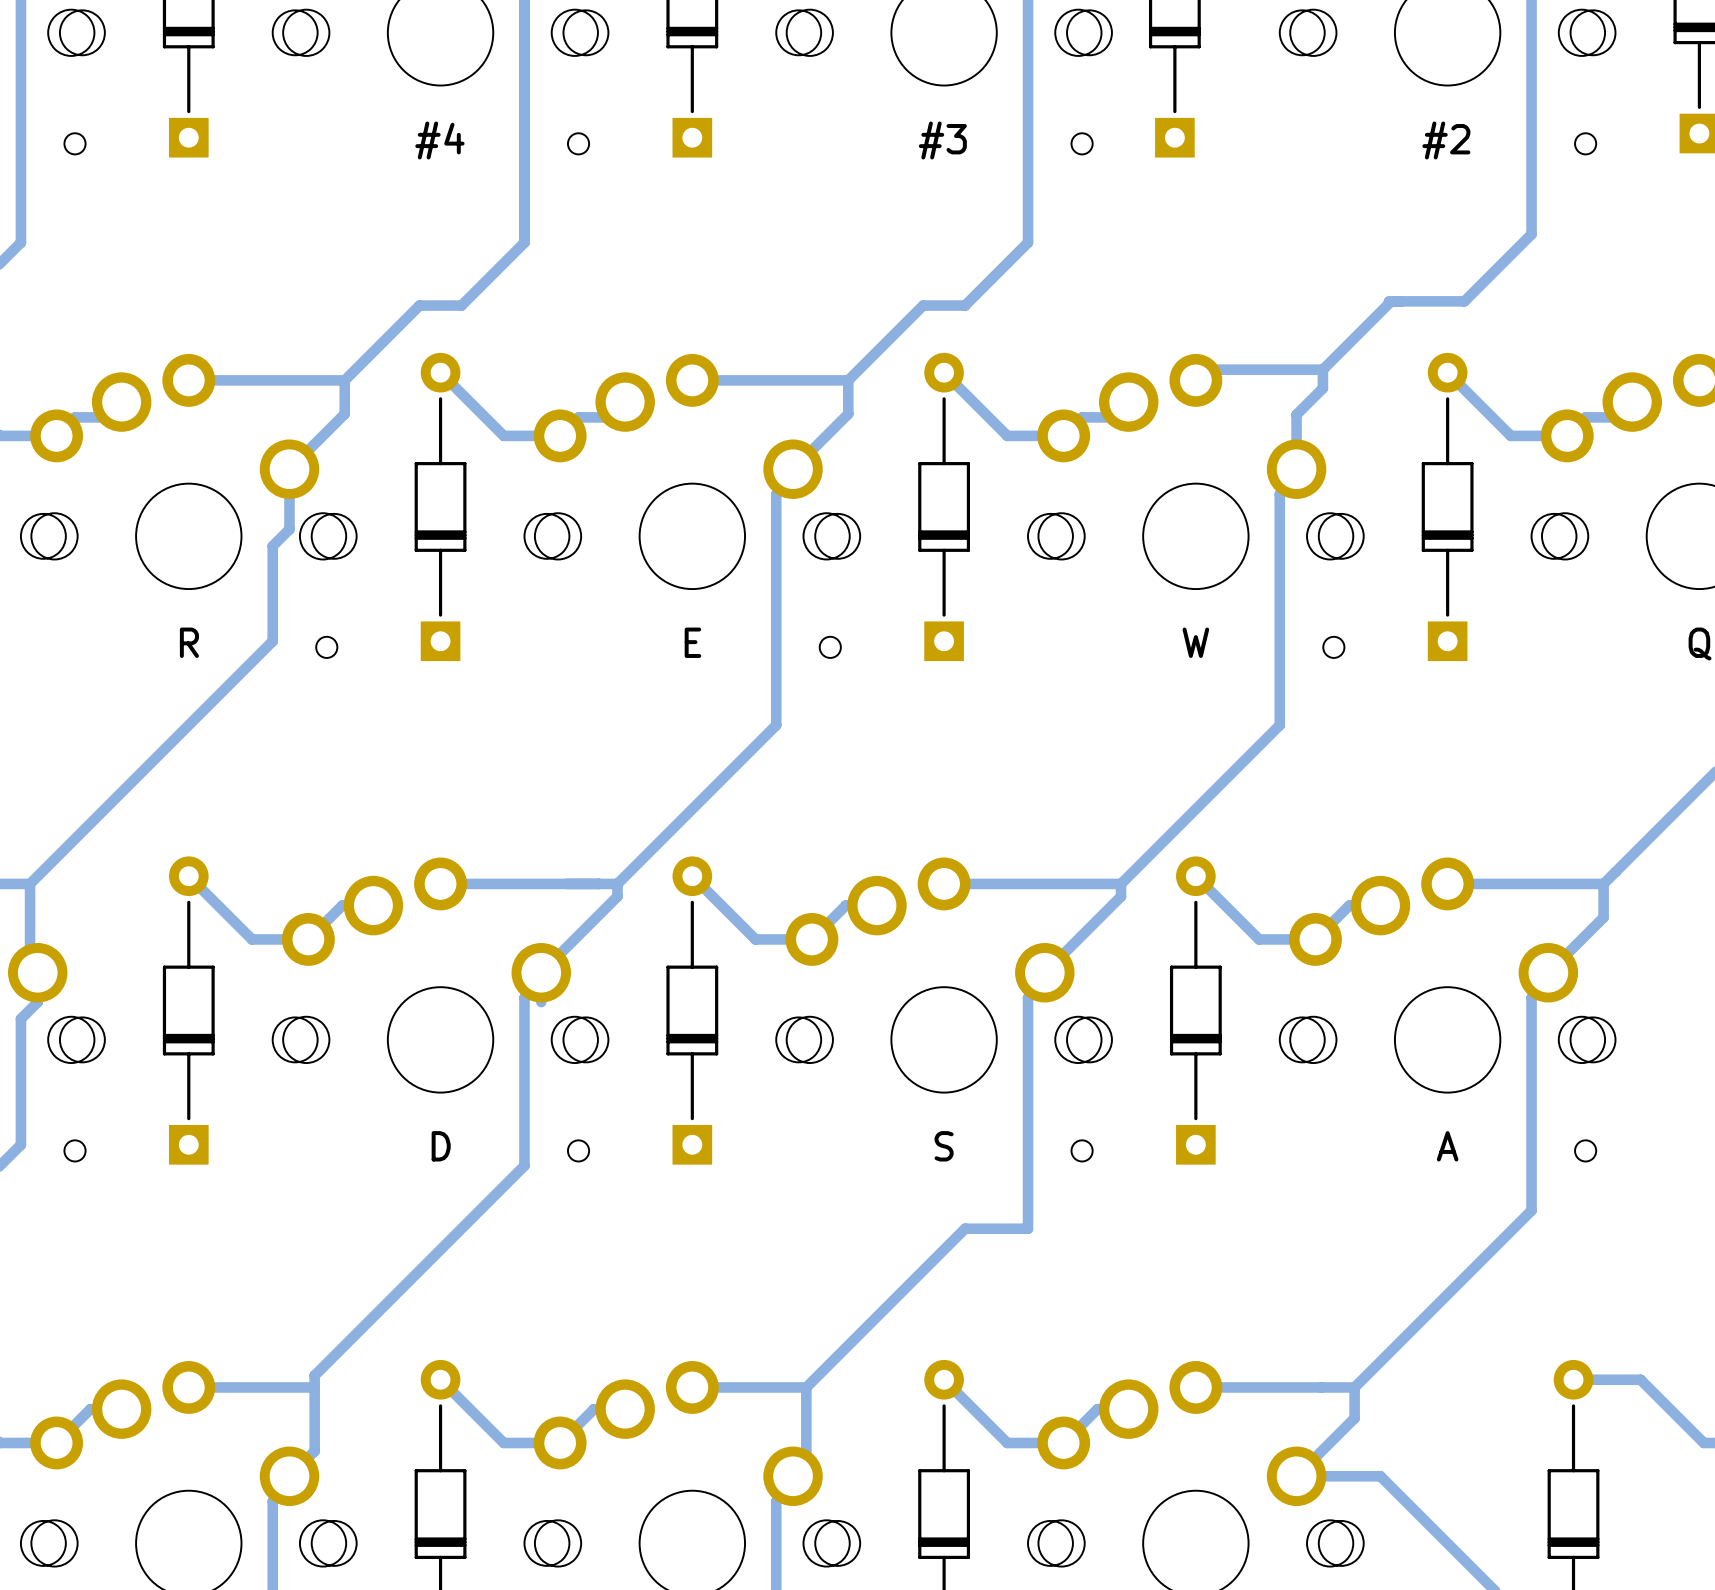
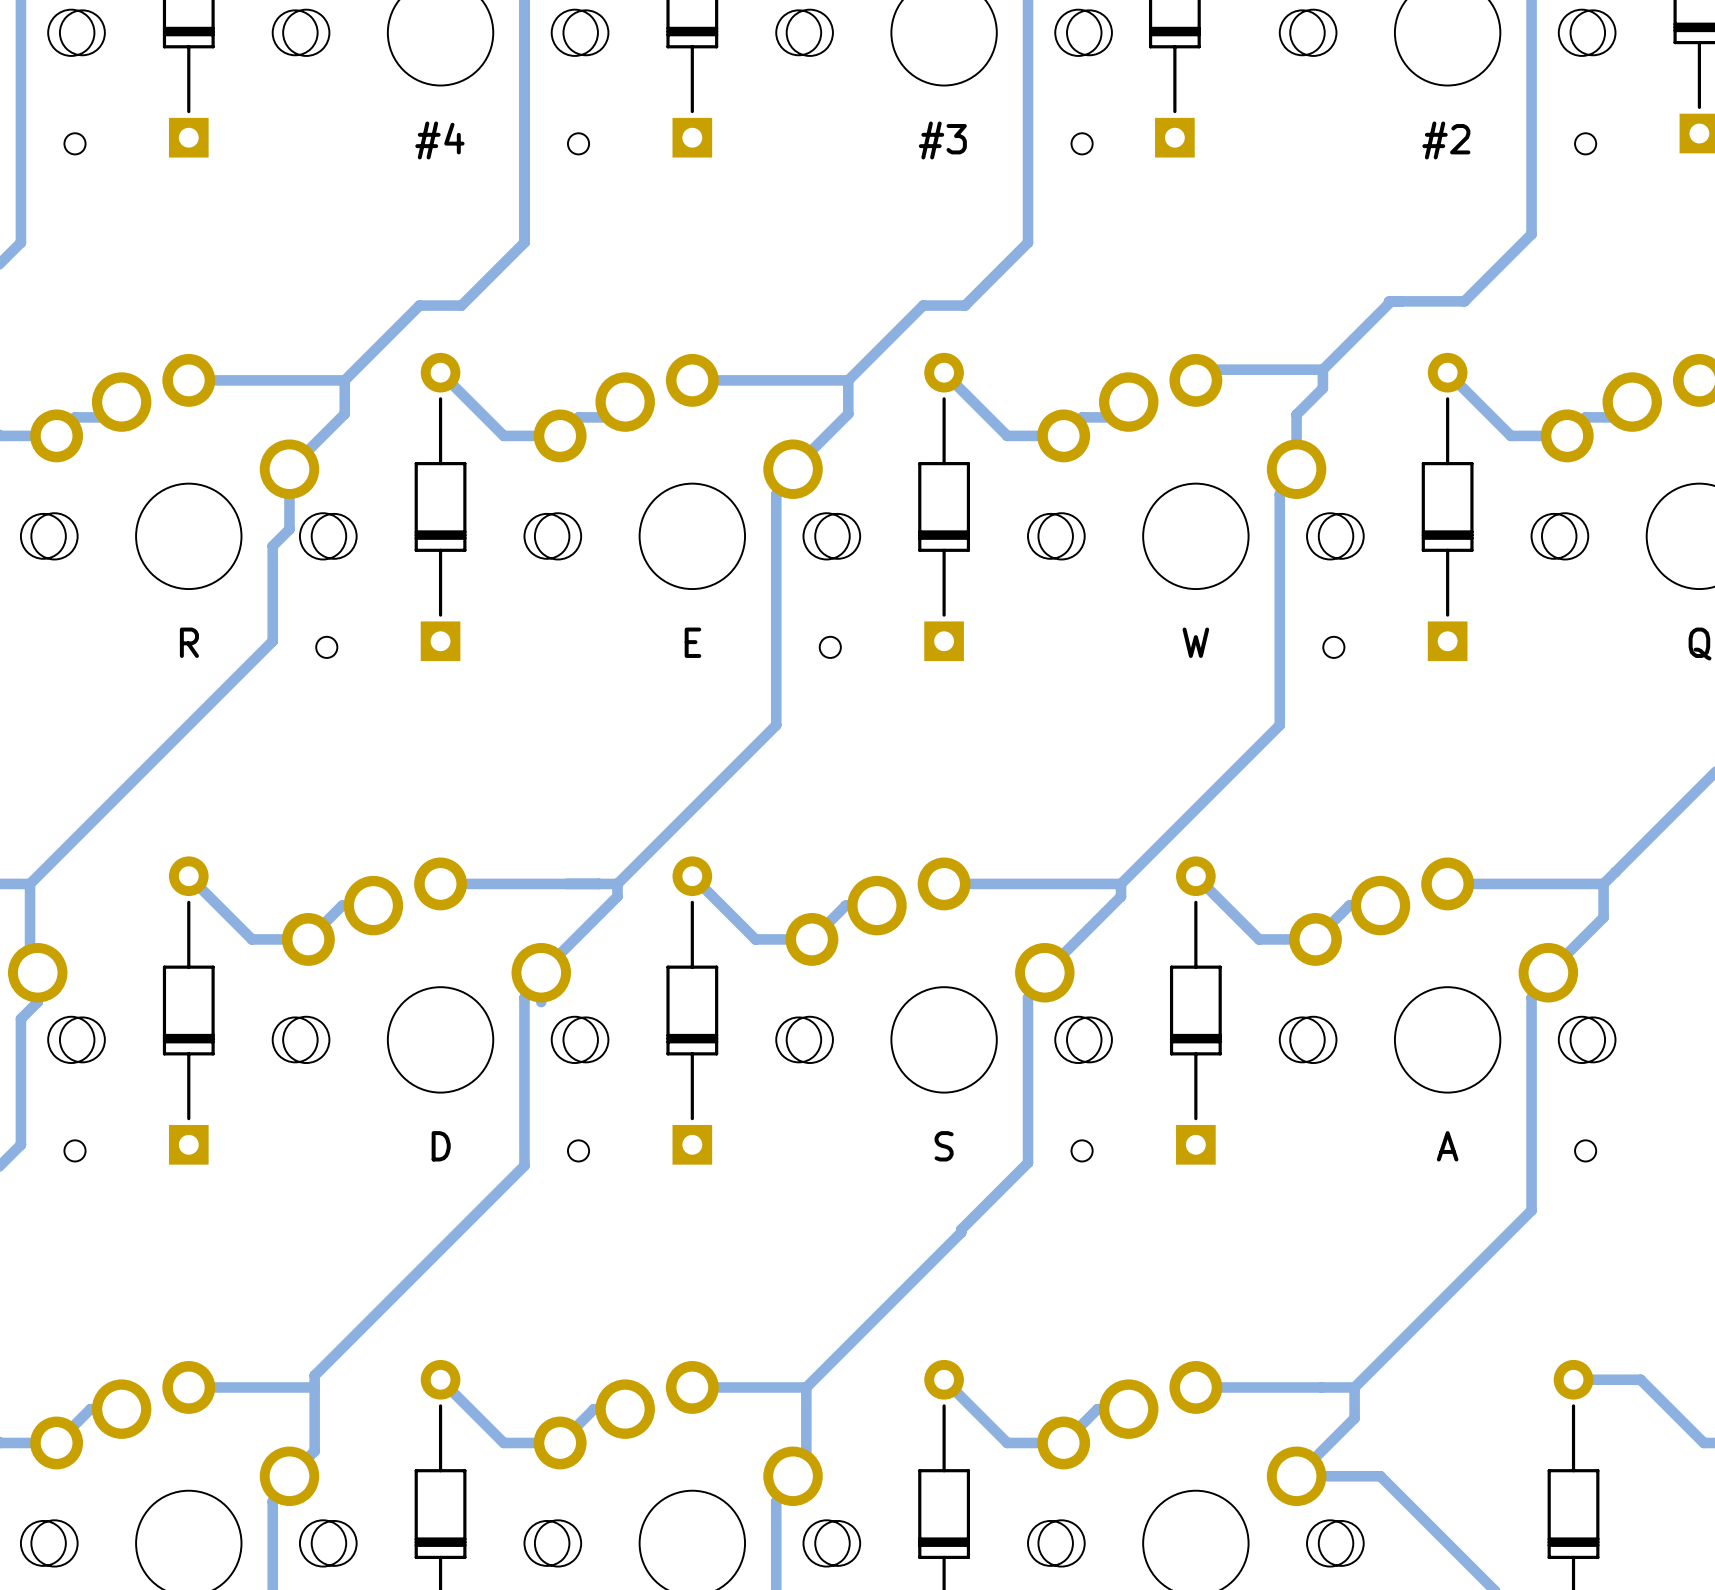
track: (1028, 1162) (1028, 1228) (965, 1228) (961, 1232) -> (1028, 1162) (961, 1229) (961, 1232)

